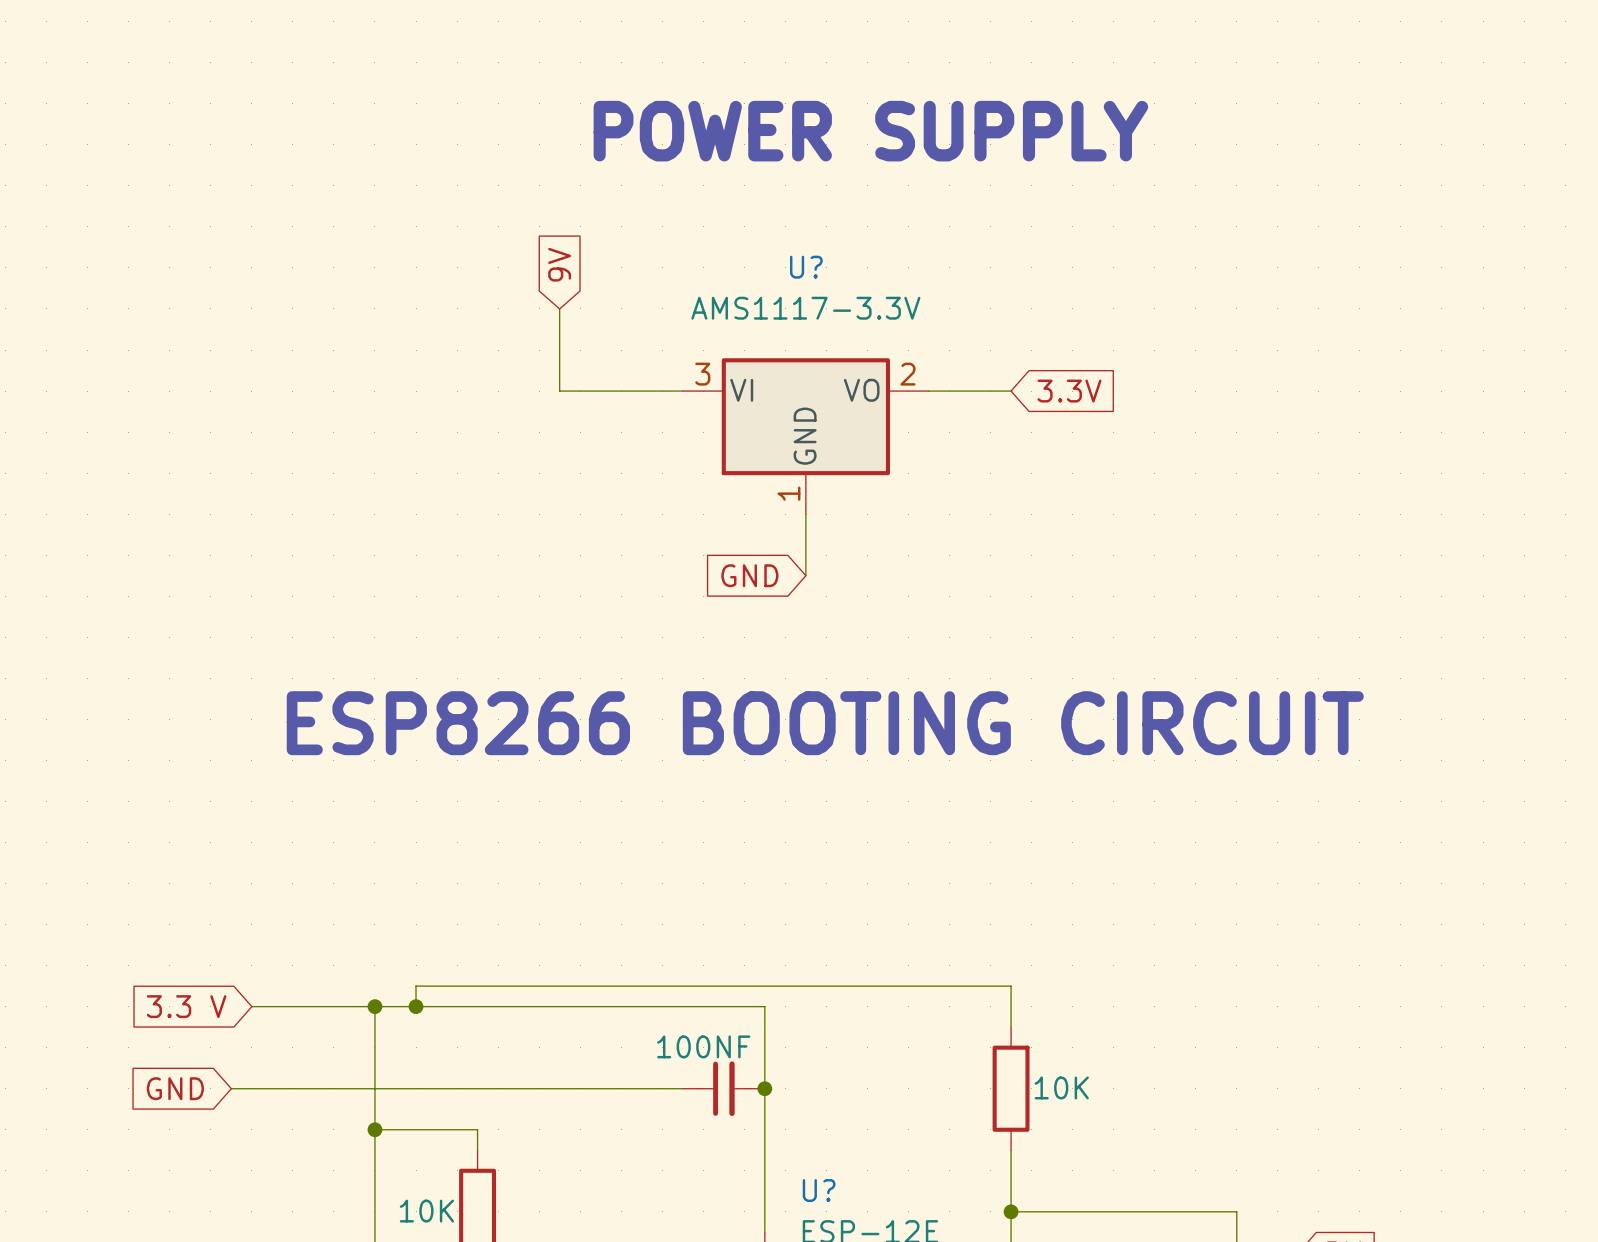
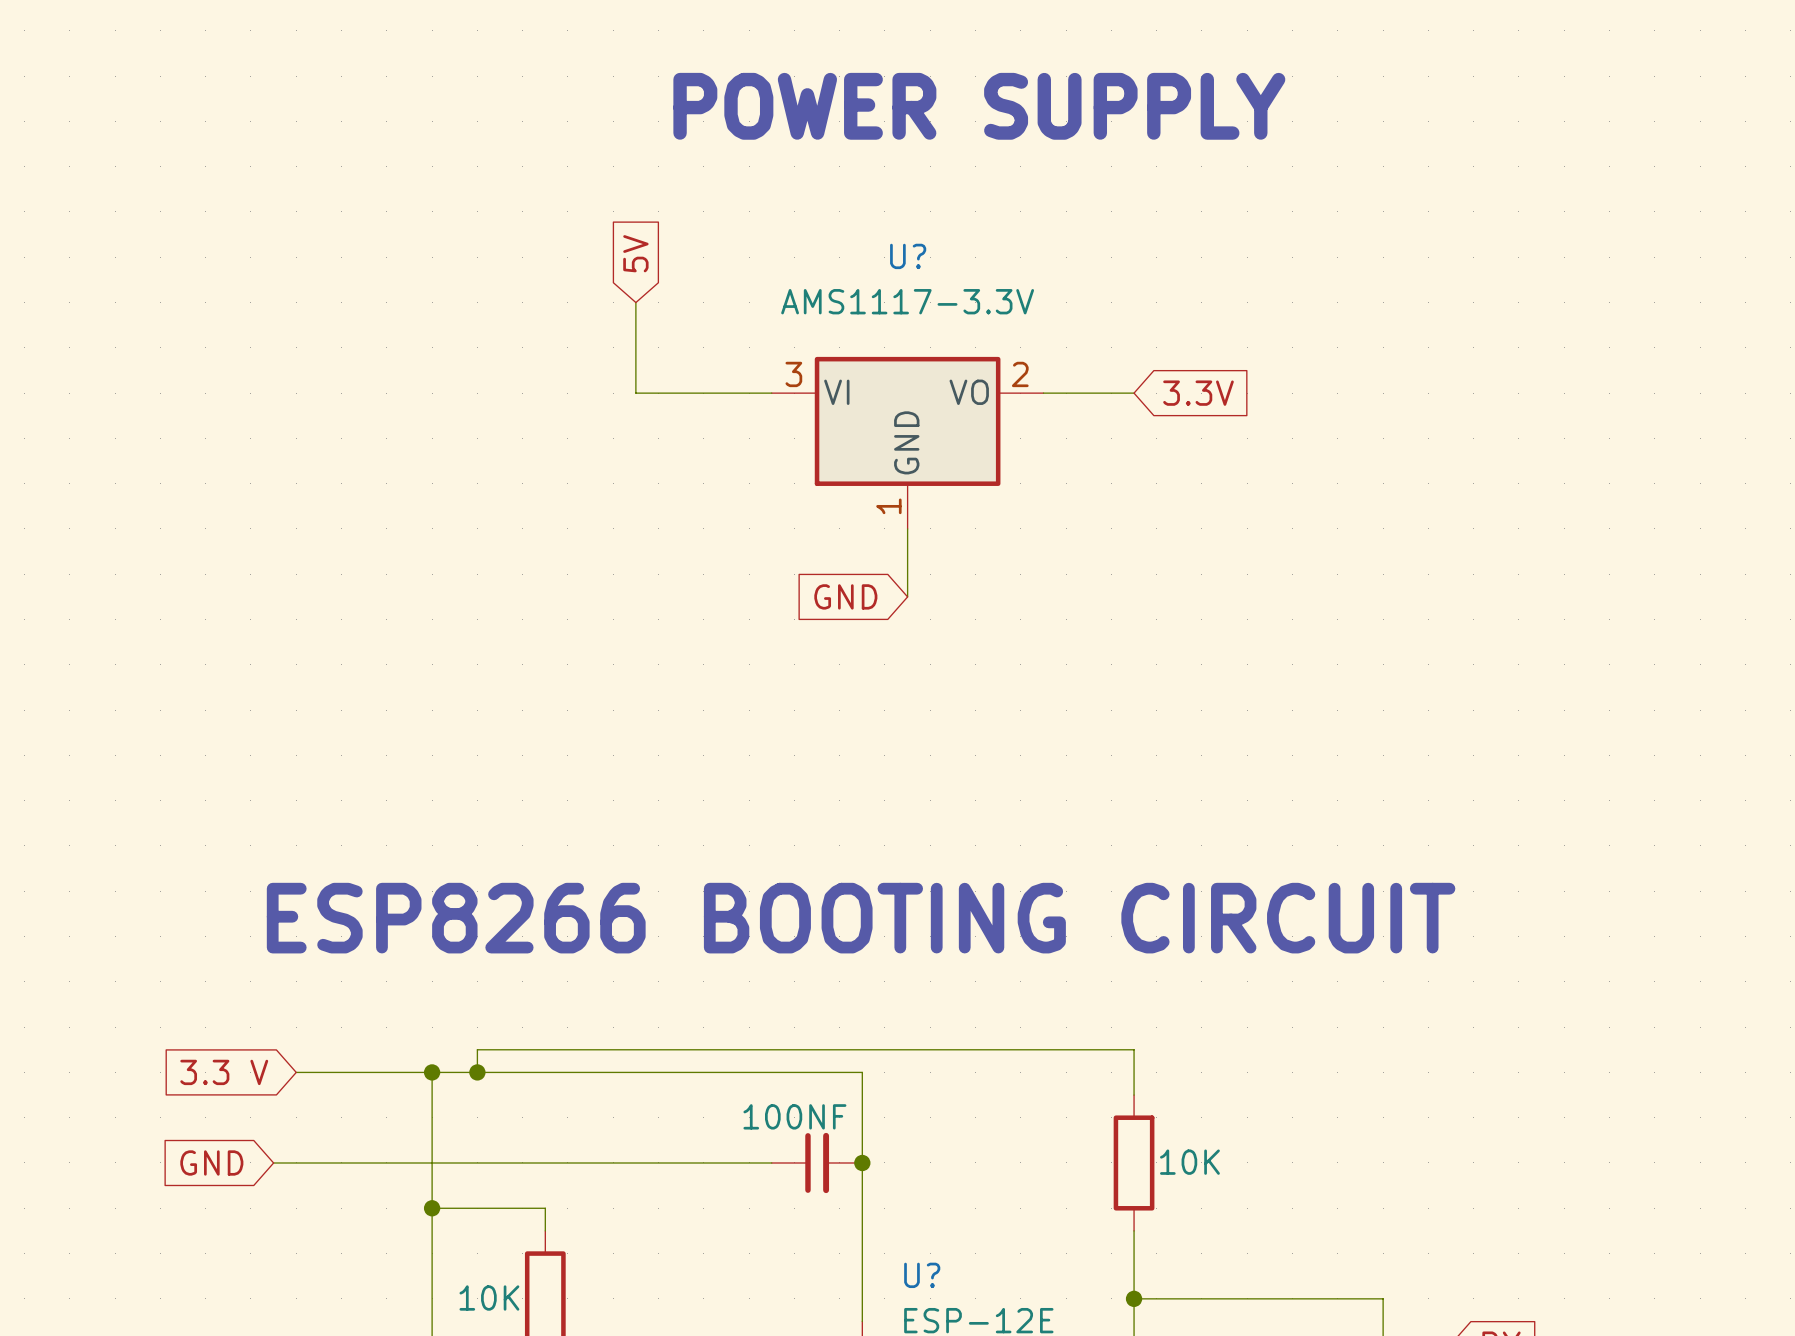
global label: 9V (559, 264) -> 5V (635, 253)
text position: ESP8266 BOOTING CIRCUIT (825, 723) -> ESP8266 BOOTING CIRCUIT (861, 918)

